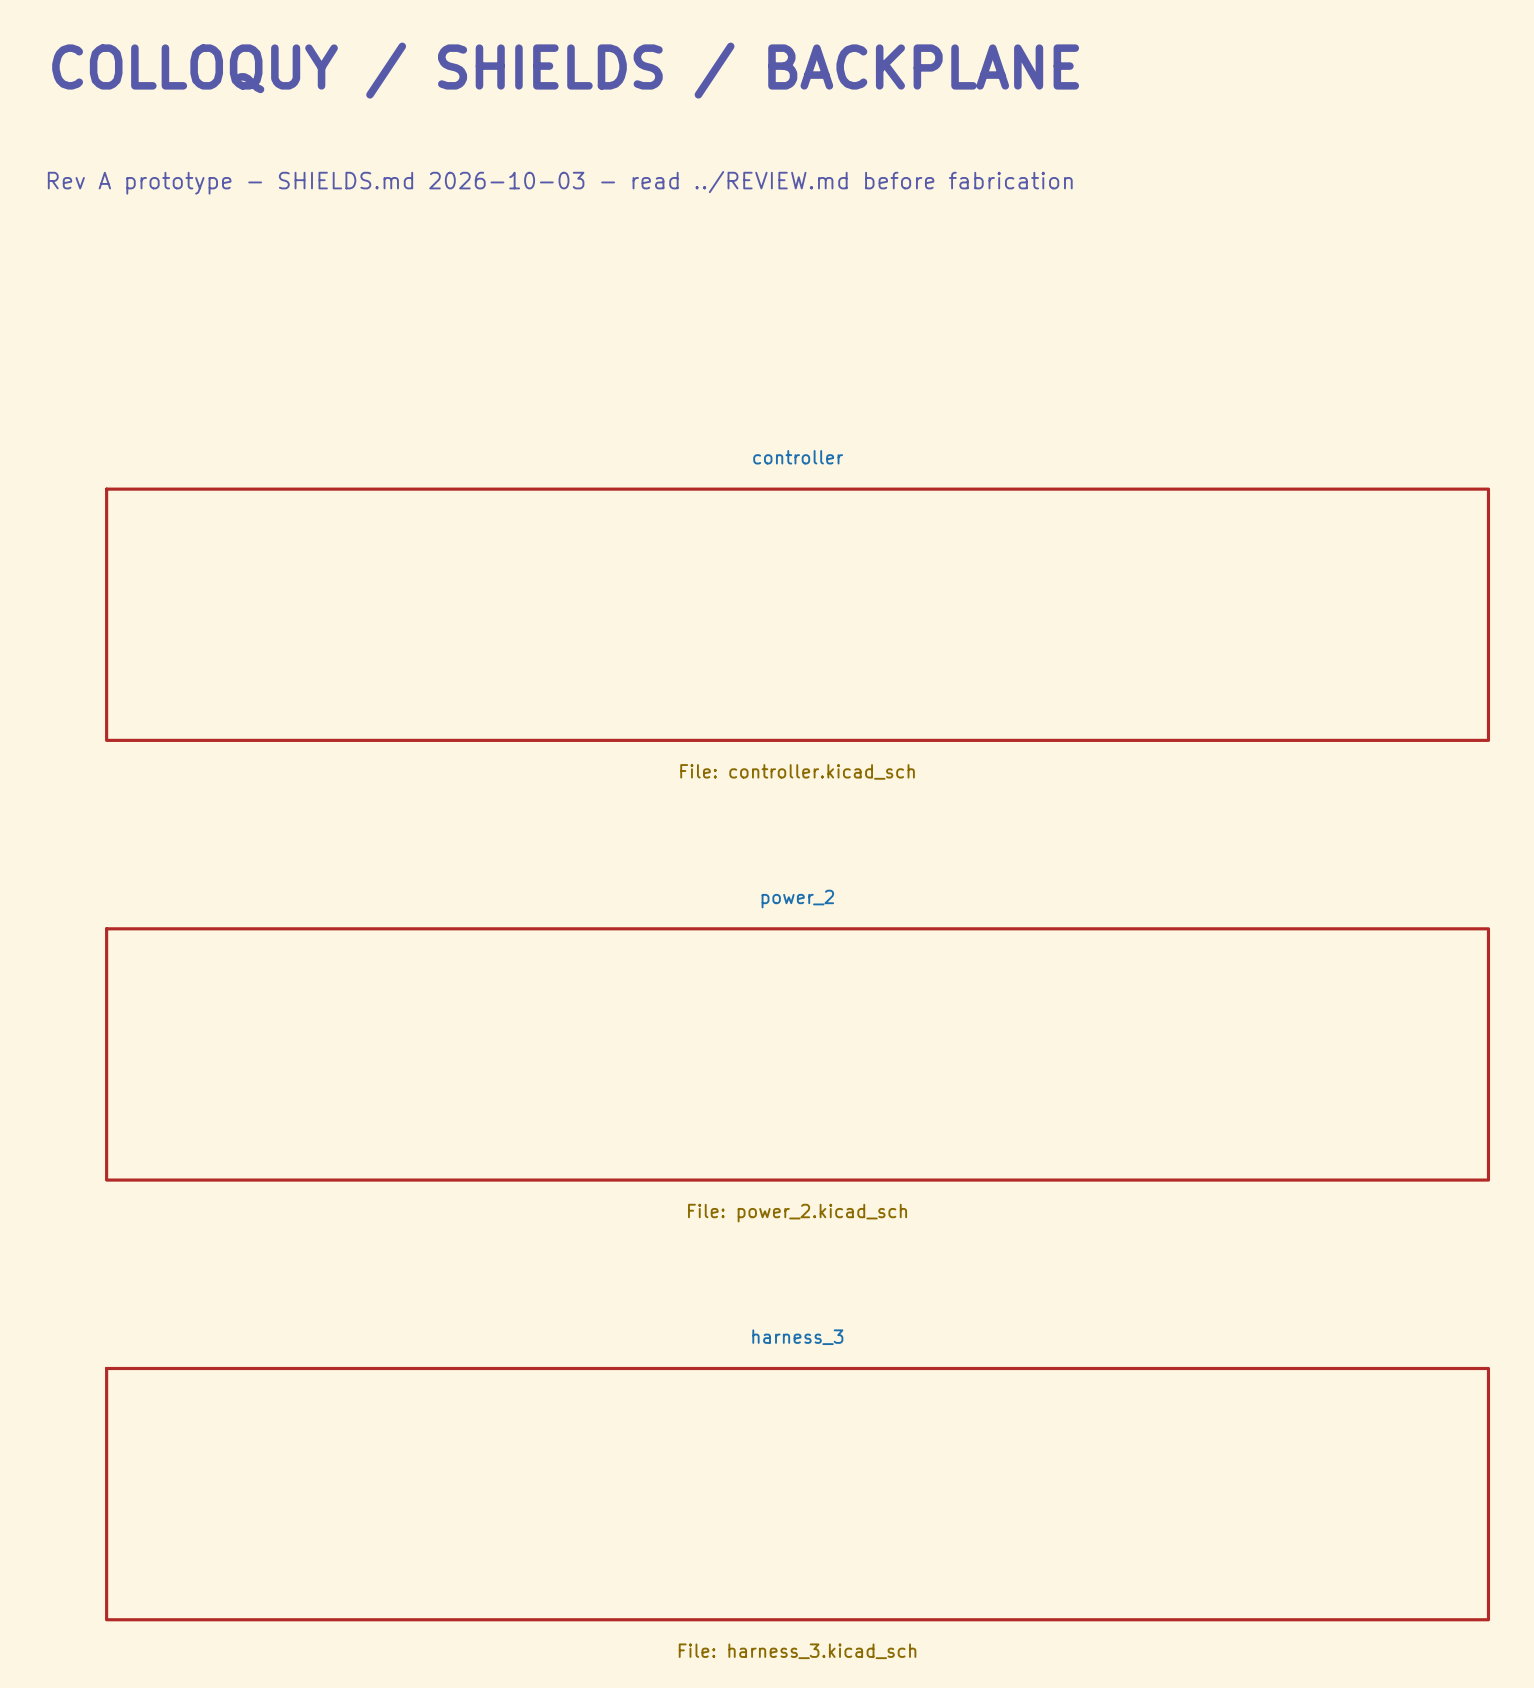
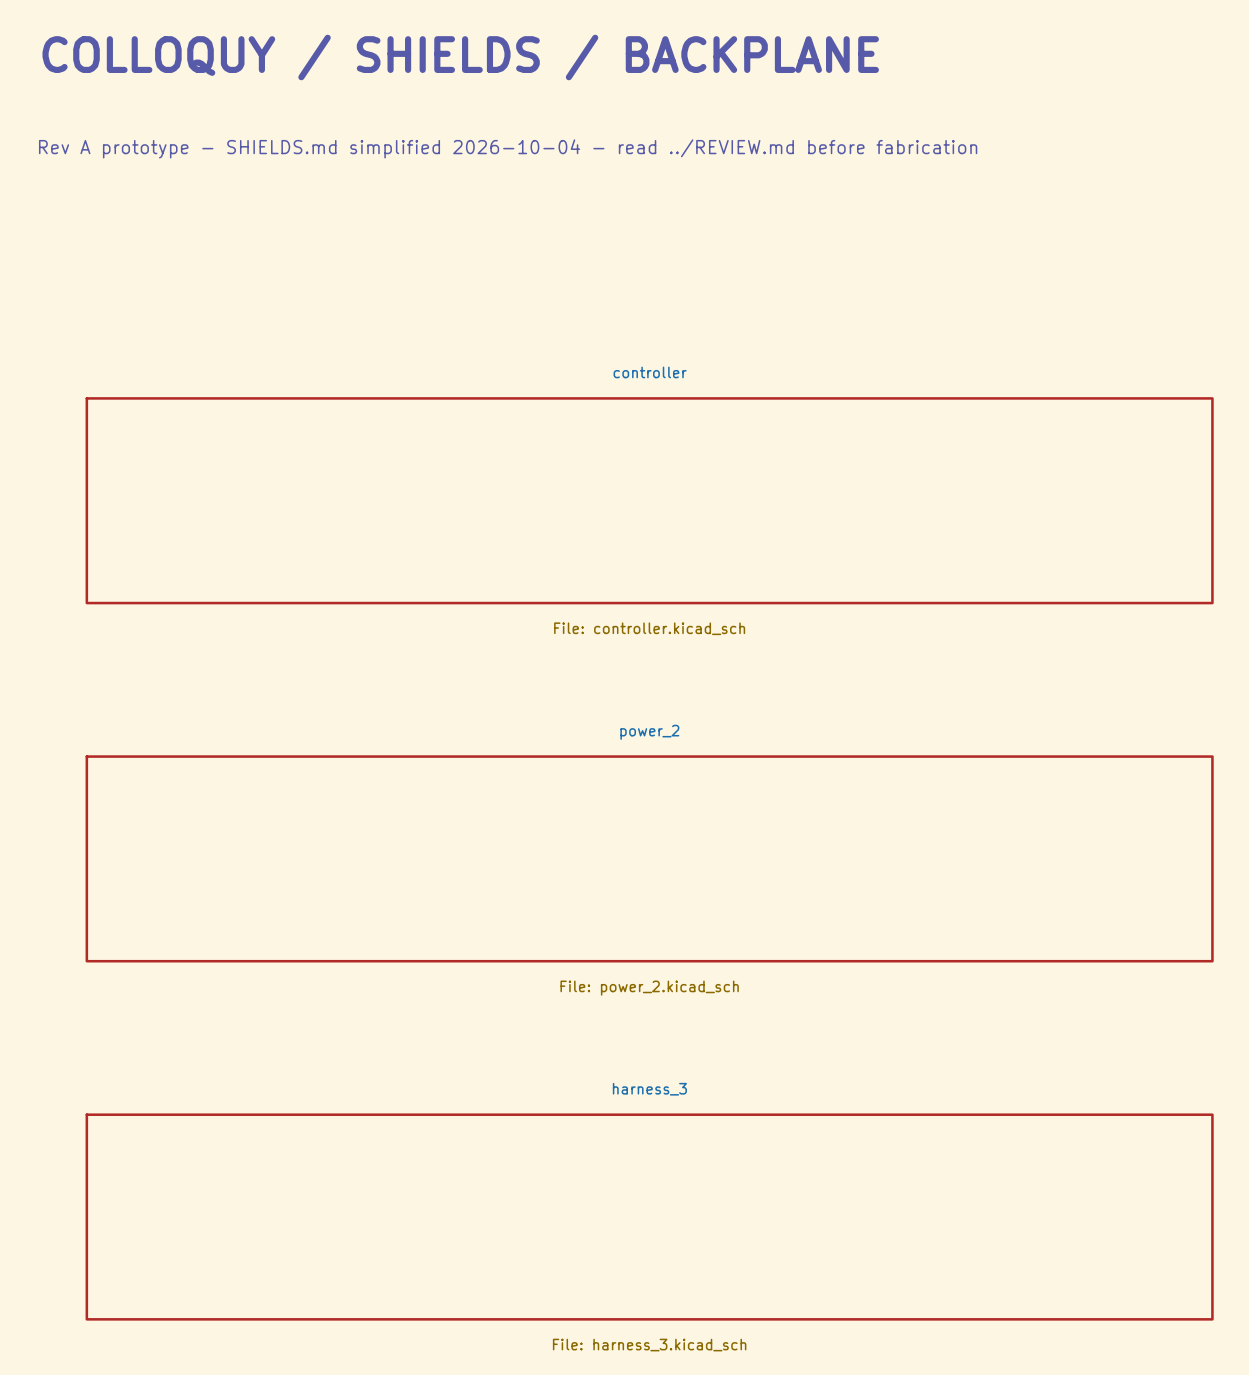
text: Rev A prototype - SHIELDS.md 2026-10-03 - read ../REVIEW.md before fabrication (560, 182) -> Rev A prototype - SHIELDS.md simplified 2026-10-04 - read ../REVIEW.md before fabrication (508, 148)

